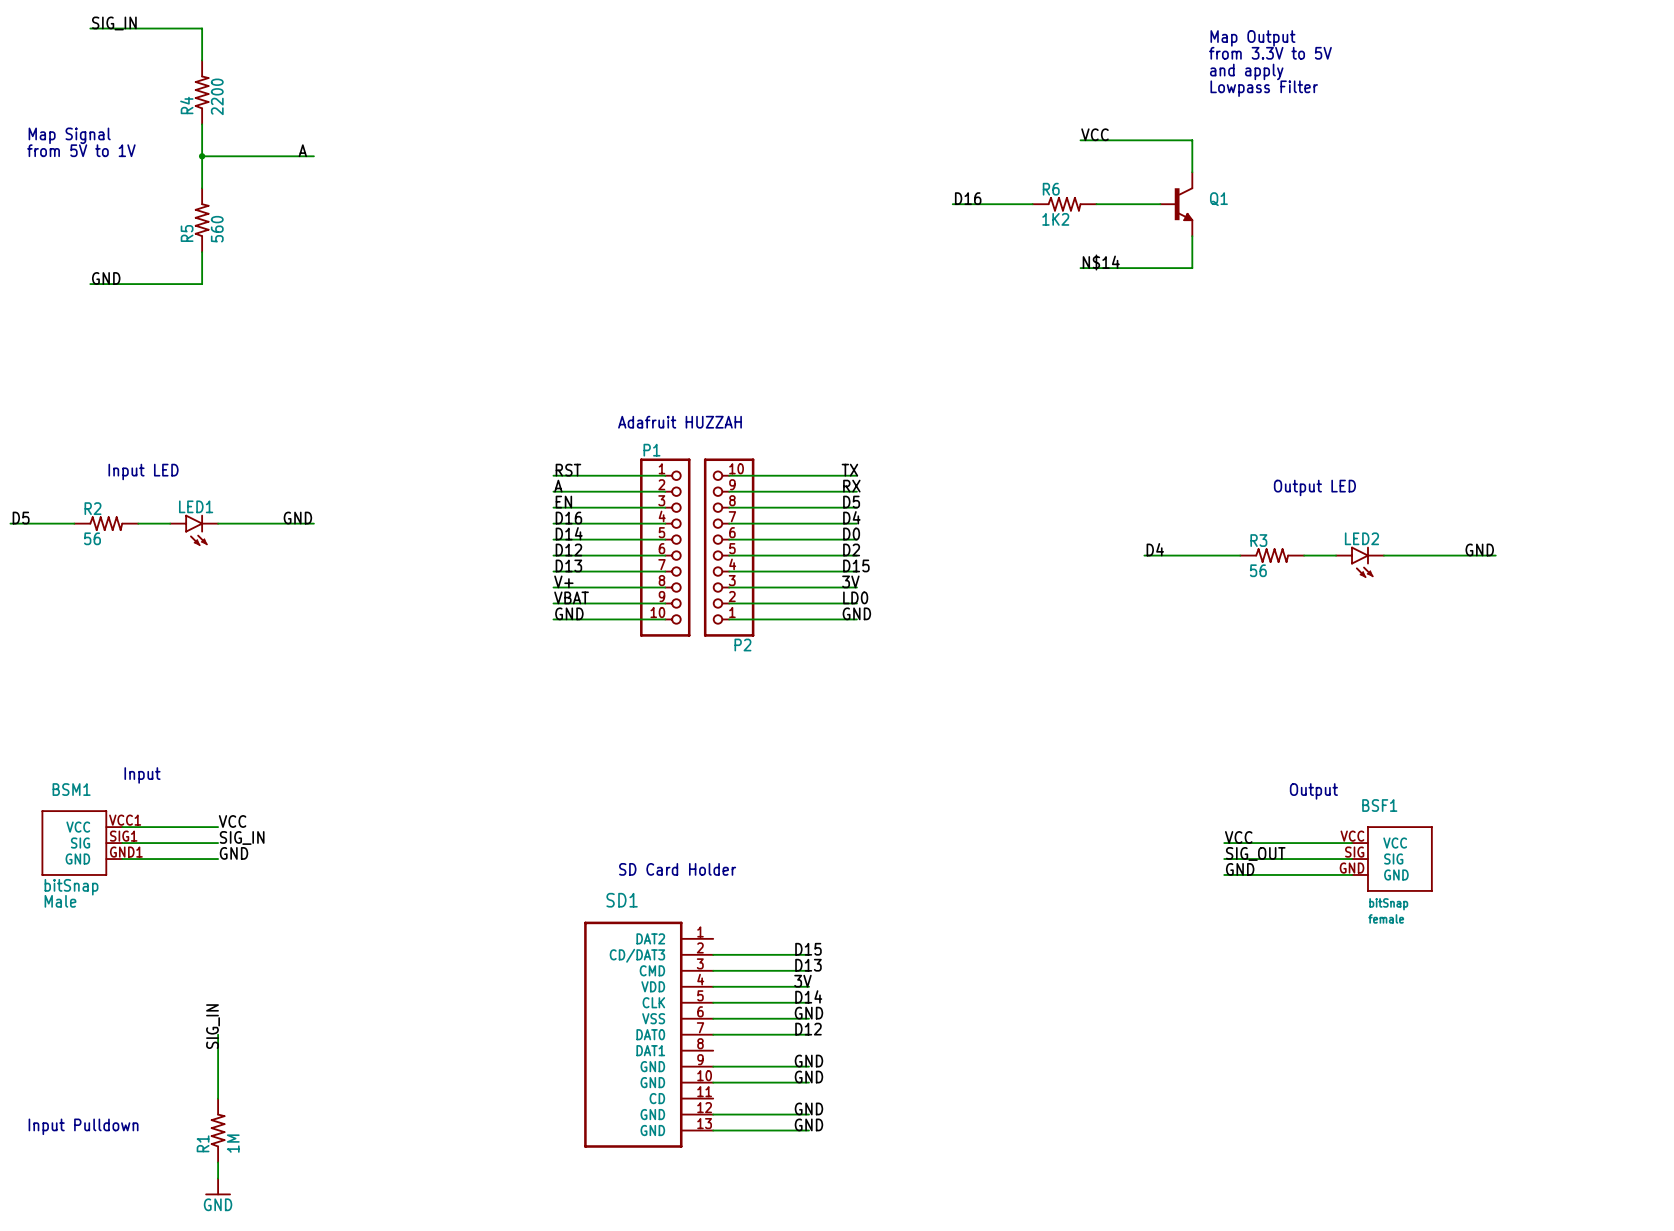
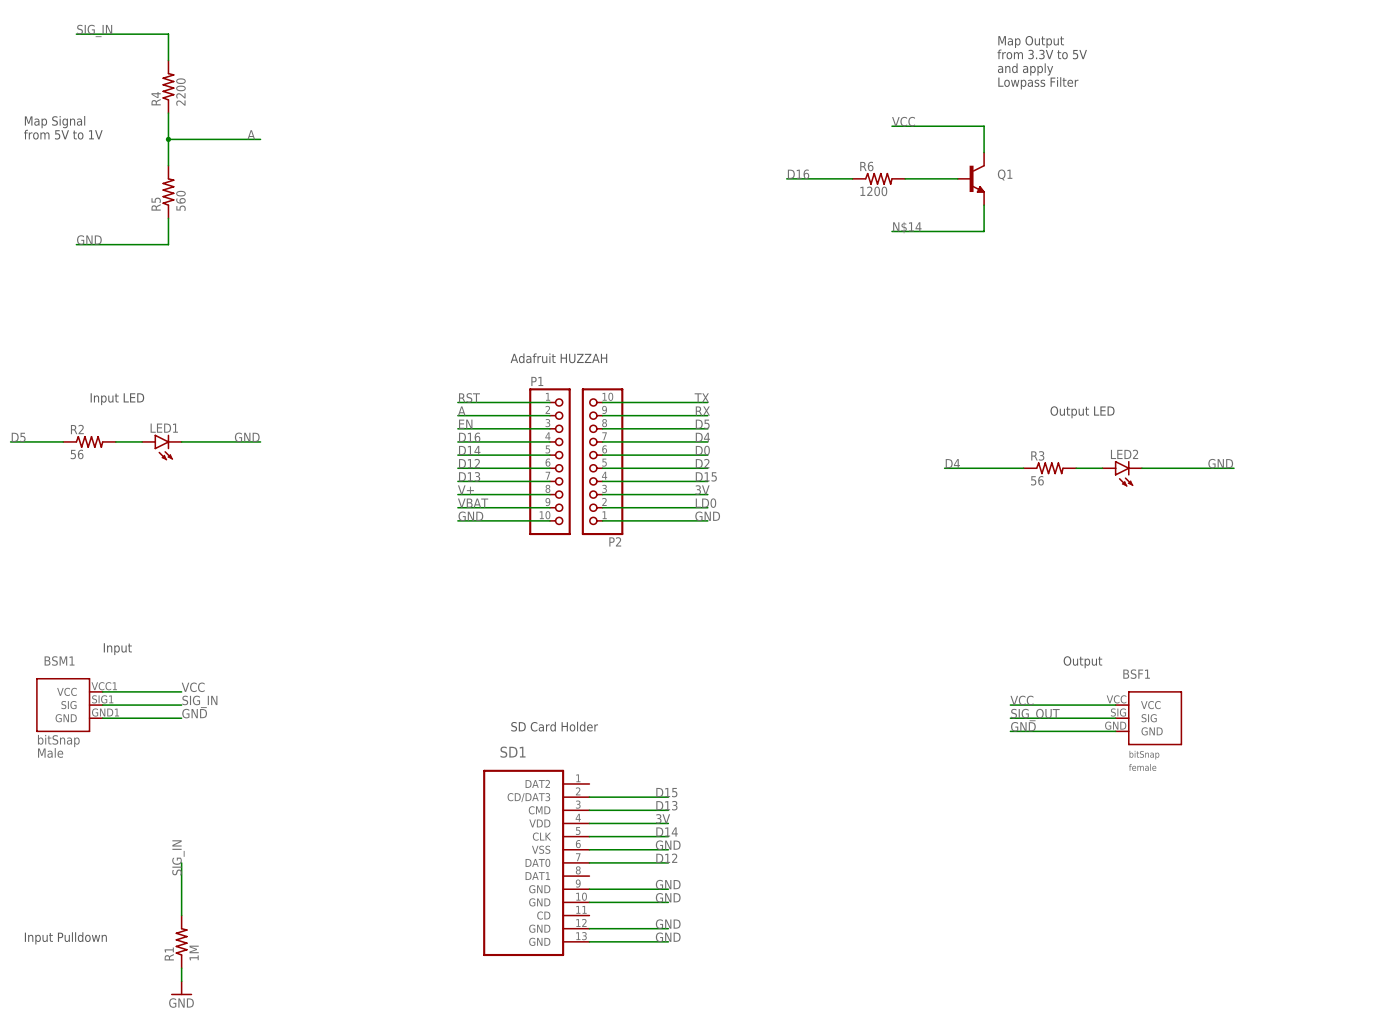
R6 value: 1K2 (1055, 219) -> 1200 (873, 191)

